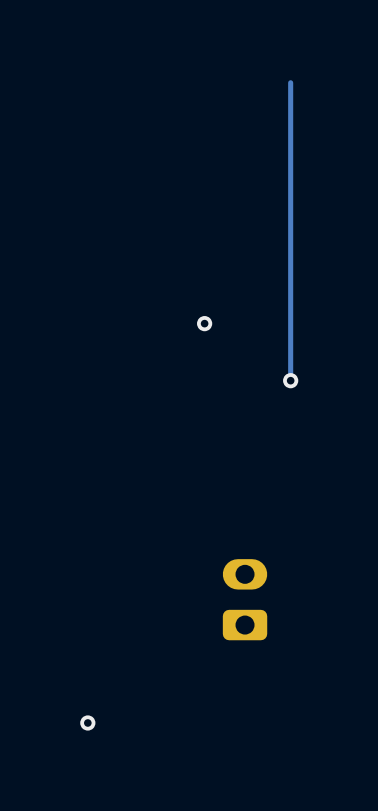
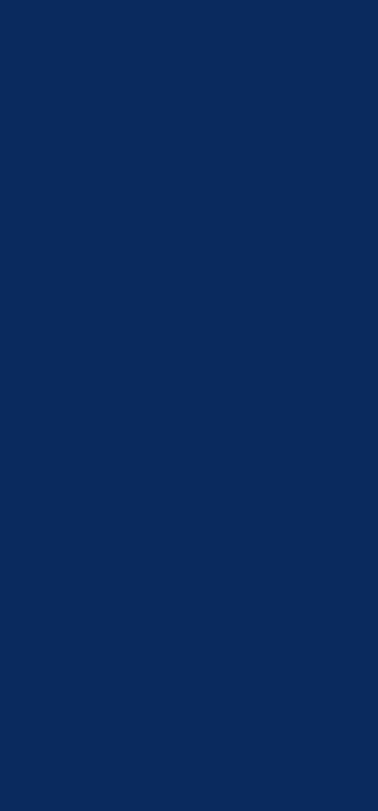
track: (290, 82) (290, 380) -> none
via: (204, 323) -> none
via: (290, 380) -> none
part: (245, 599) -> none
via: (87, 722) -> none

